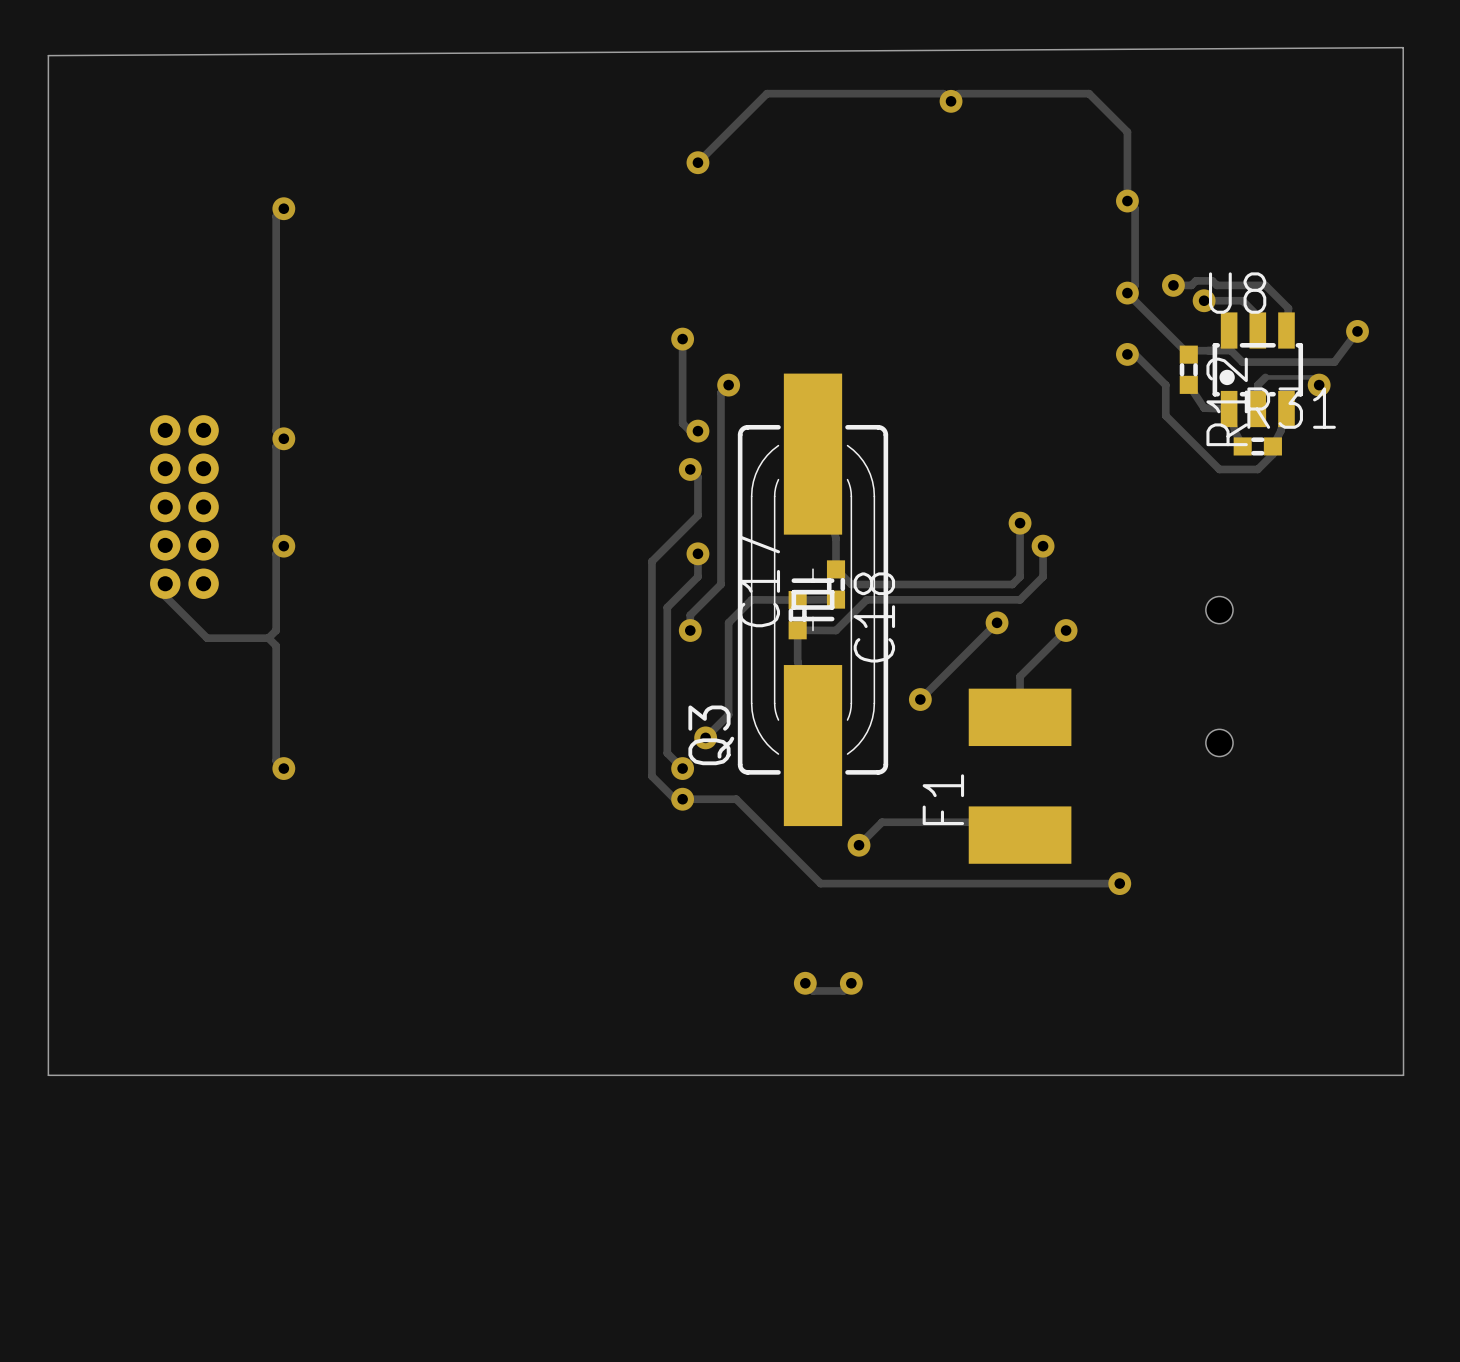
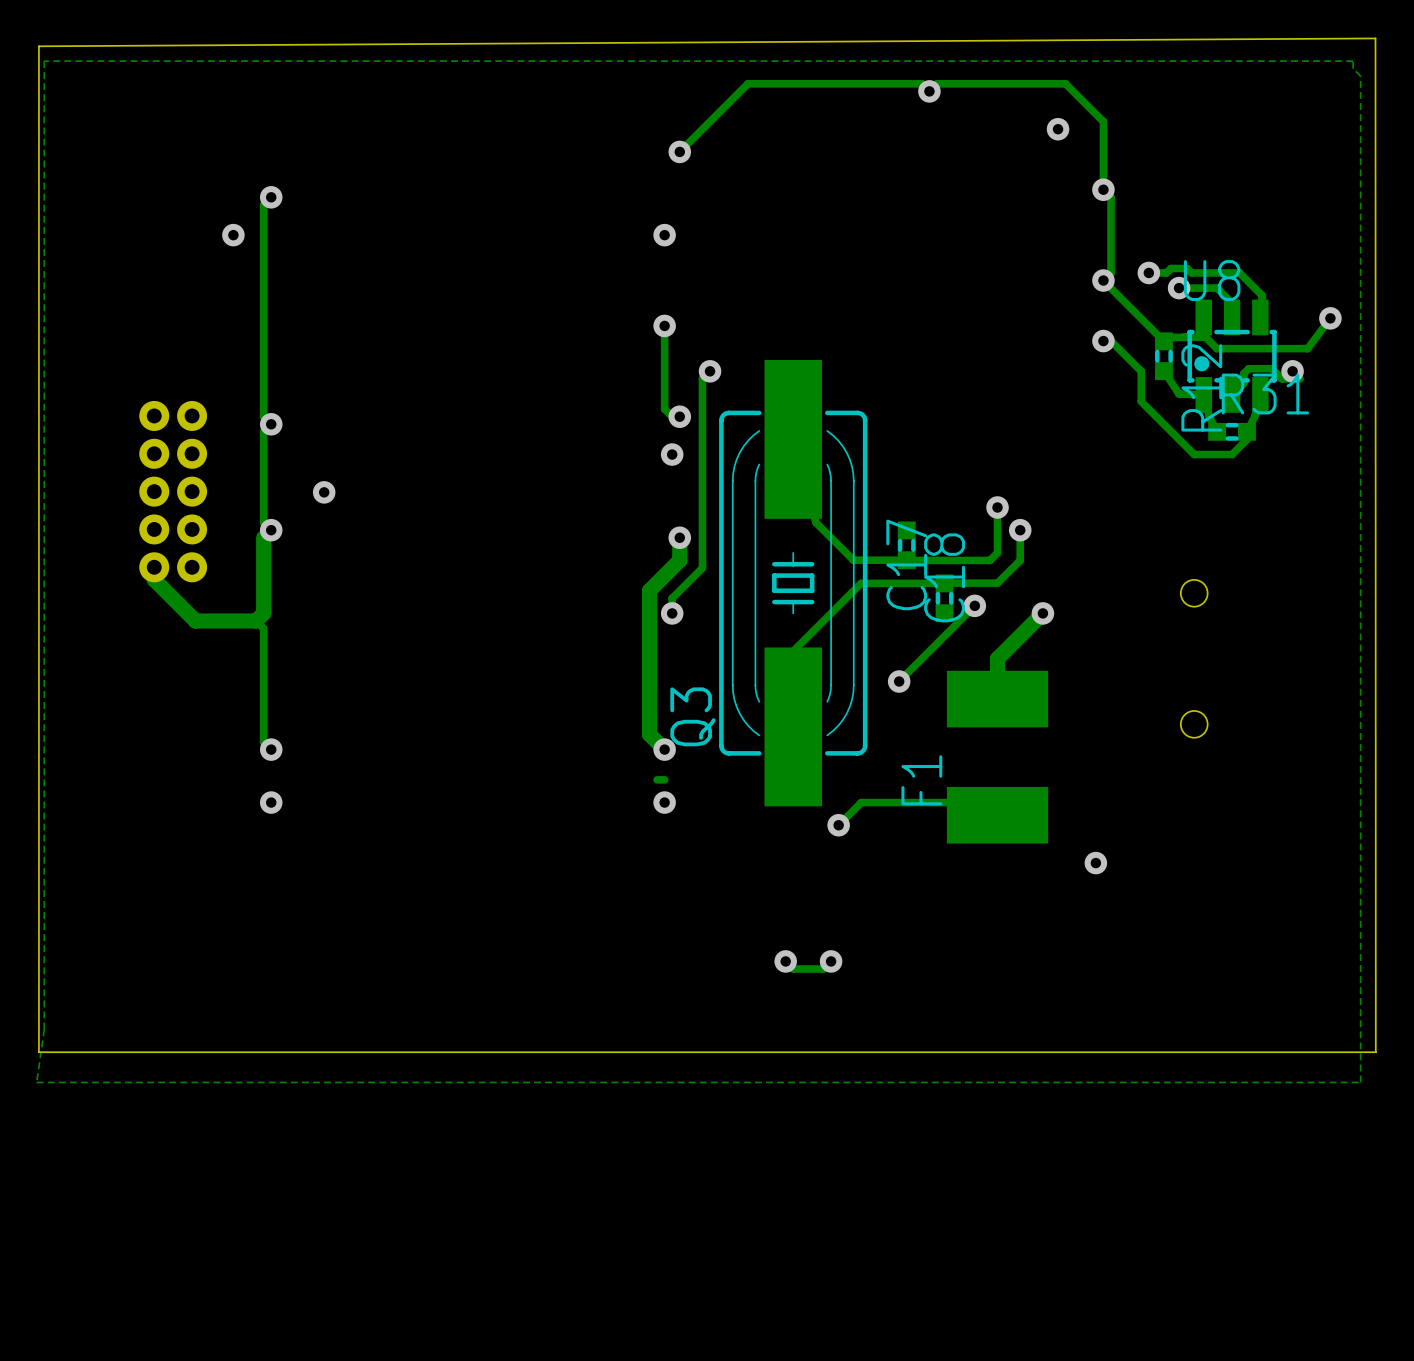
zone outline: none -> (1353, 61) (44, 61) (44, 1029) (36, 1082) (1360, 1082) (1360, 76) (1353, 68) (1353, 61)
via: none -> (1058, 129)
via: none -> (233, 235)
via: none -> (664, 235)
track: (1319, 385) (1311, 377) (1265, 377) (1257, 385) (1257, 392) -> none
track: none -> (1300, 378) (1282, 378) (1271, 368) (1248, 368) (1243, 373) (1243, 383) (1232, 394)
track: (690, 469) (697, 477) (697, 515) (651, 561) (651, 776) (674, 799) -> none
via: none -> (324, 492)
track: (836, 538) (836, 569) (851, 584) (1012, 584) (1020, 576) (1020, 569) -> (815, 522) (853, 560) (906, 560)
track width: thin (276, 553) (276, 630) (268, 638) (207, 638) (165, 596) (165, 583) -> thick (263, 537) (263, 613) (256, 620) (195, 620) (154, 579) (154, 567)
track width: thin (697, 553) (697, 576) (667, 607) (667, 753) (682, 768) -> thick (679, 537) (679, 560) (649, 590) (649, 734) (664, 749)
track: none -> (997, 552) (989, 560) (906, 560)
C18 position: (836, 584) -> (906, 545)
track: (836, 599) (751, 599) (728, 622) (728, 714) (705, 737) -> none
track: (966, 599) (866, 599) (836, 630) (797, 630) (797, 661) (813, 745) -> (944, 583) (861, 583) (793, 651) (793, 726)
C17 position: (797, 615) -> (944, 598)
track width: thin (1066, 630) (1020, 676) (1020, 717) -> thick (1042, 613) (997, 658) (997, 699)
via: (705, 737) -> none
track: (682, 799) (736, 799) (820, 883) (1119, 883) -> none
via position: (682, 799) -> (664, 802)
via: none -> (271, 802)

